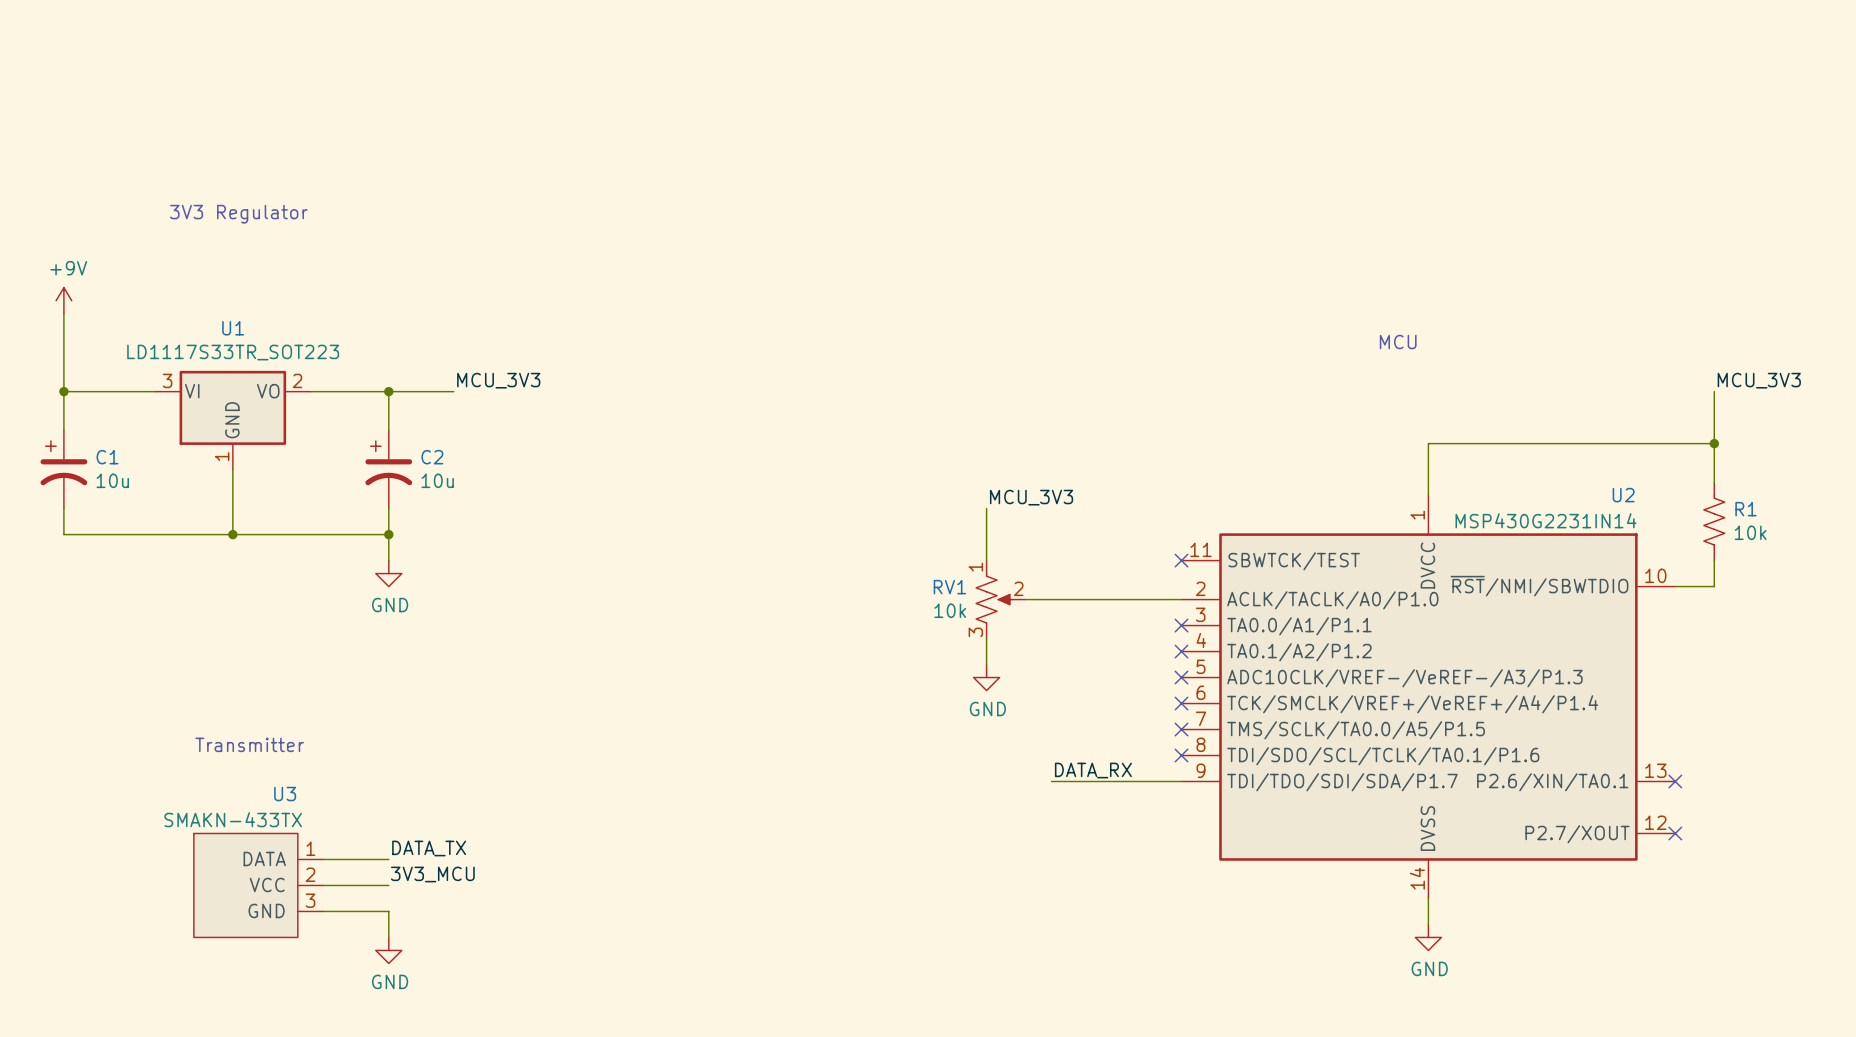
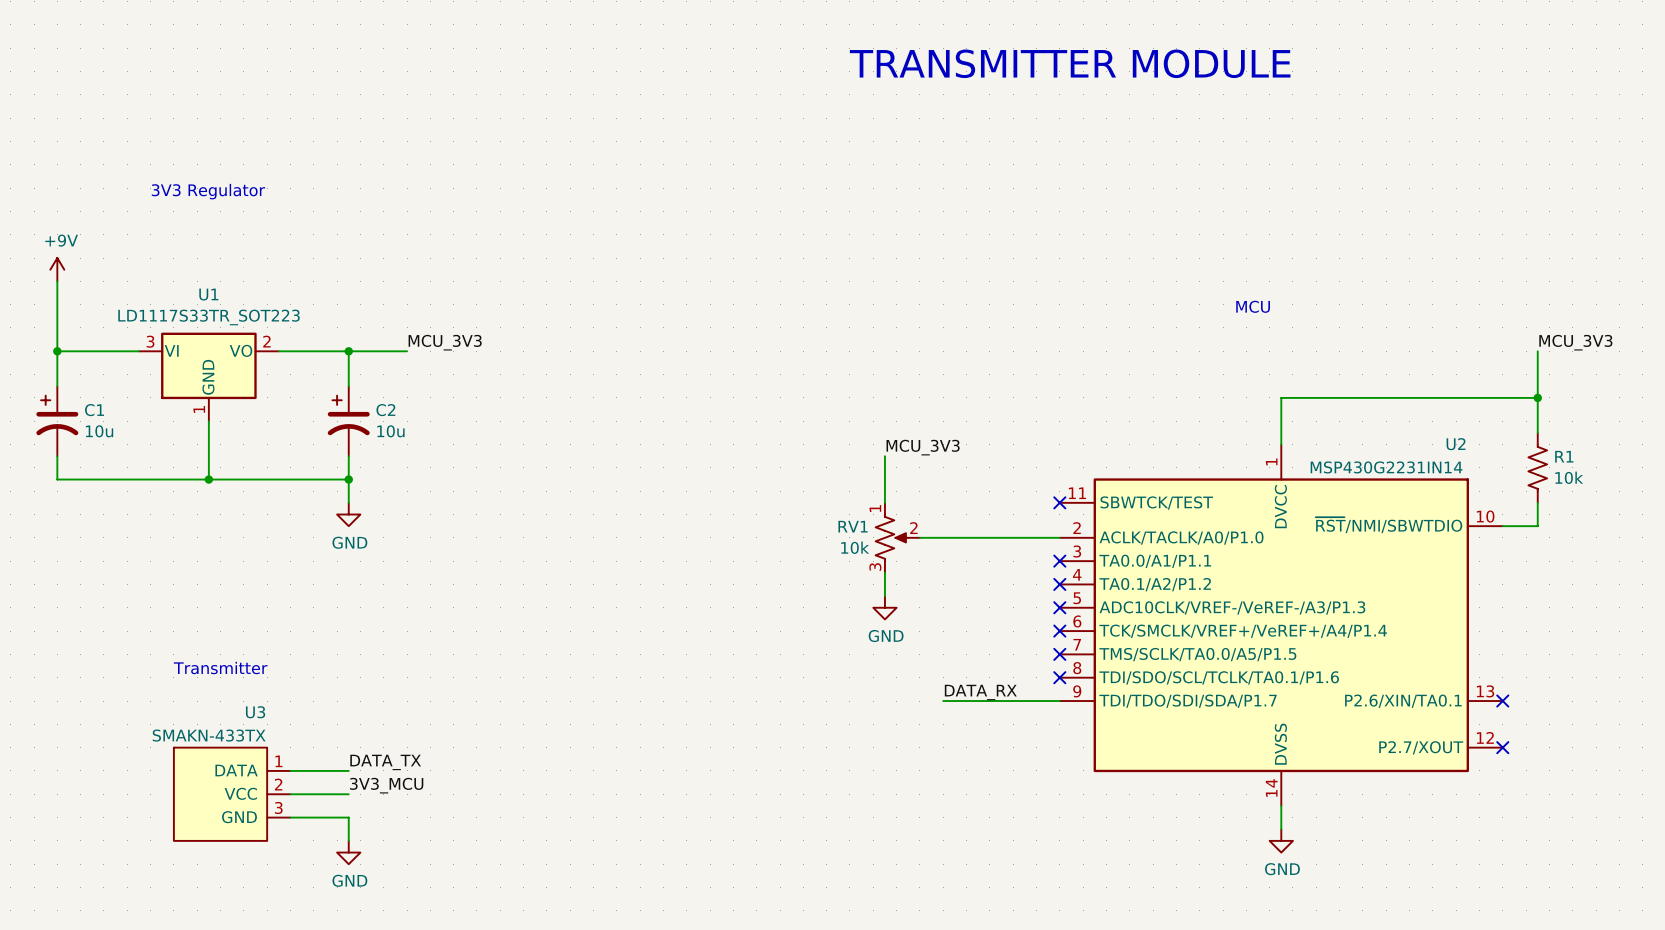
text: none -> TRANSMITTER MODULE (1070, 63)

